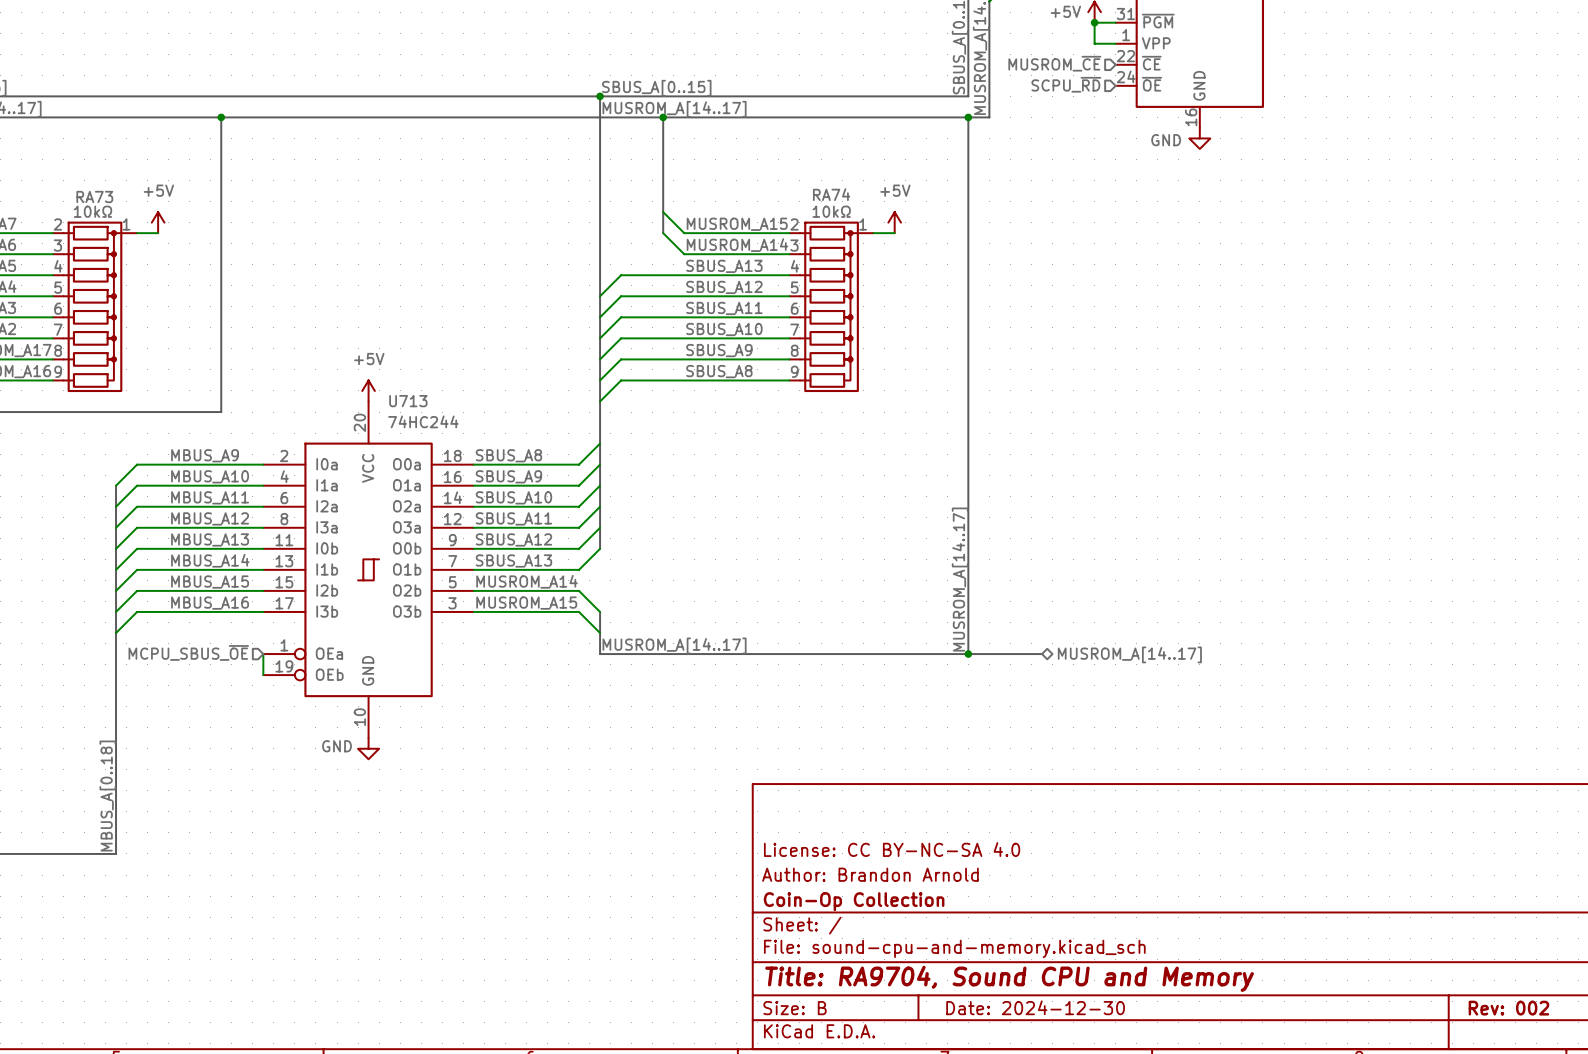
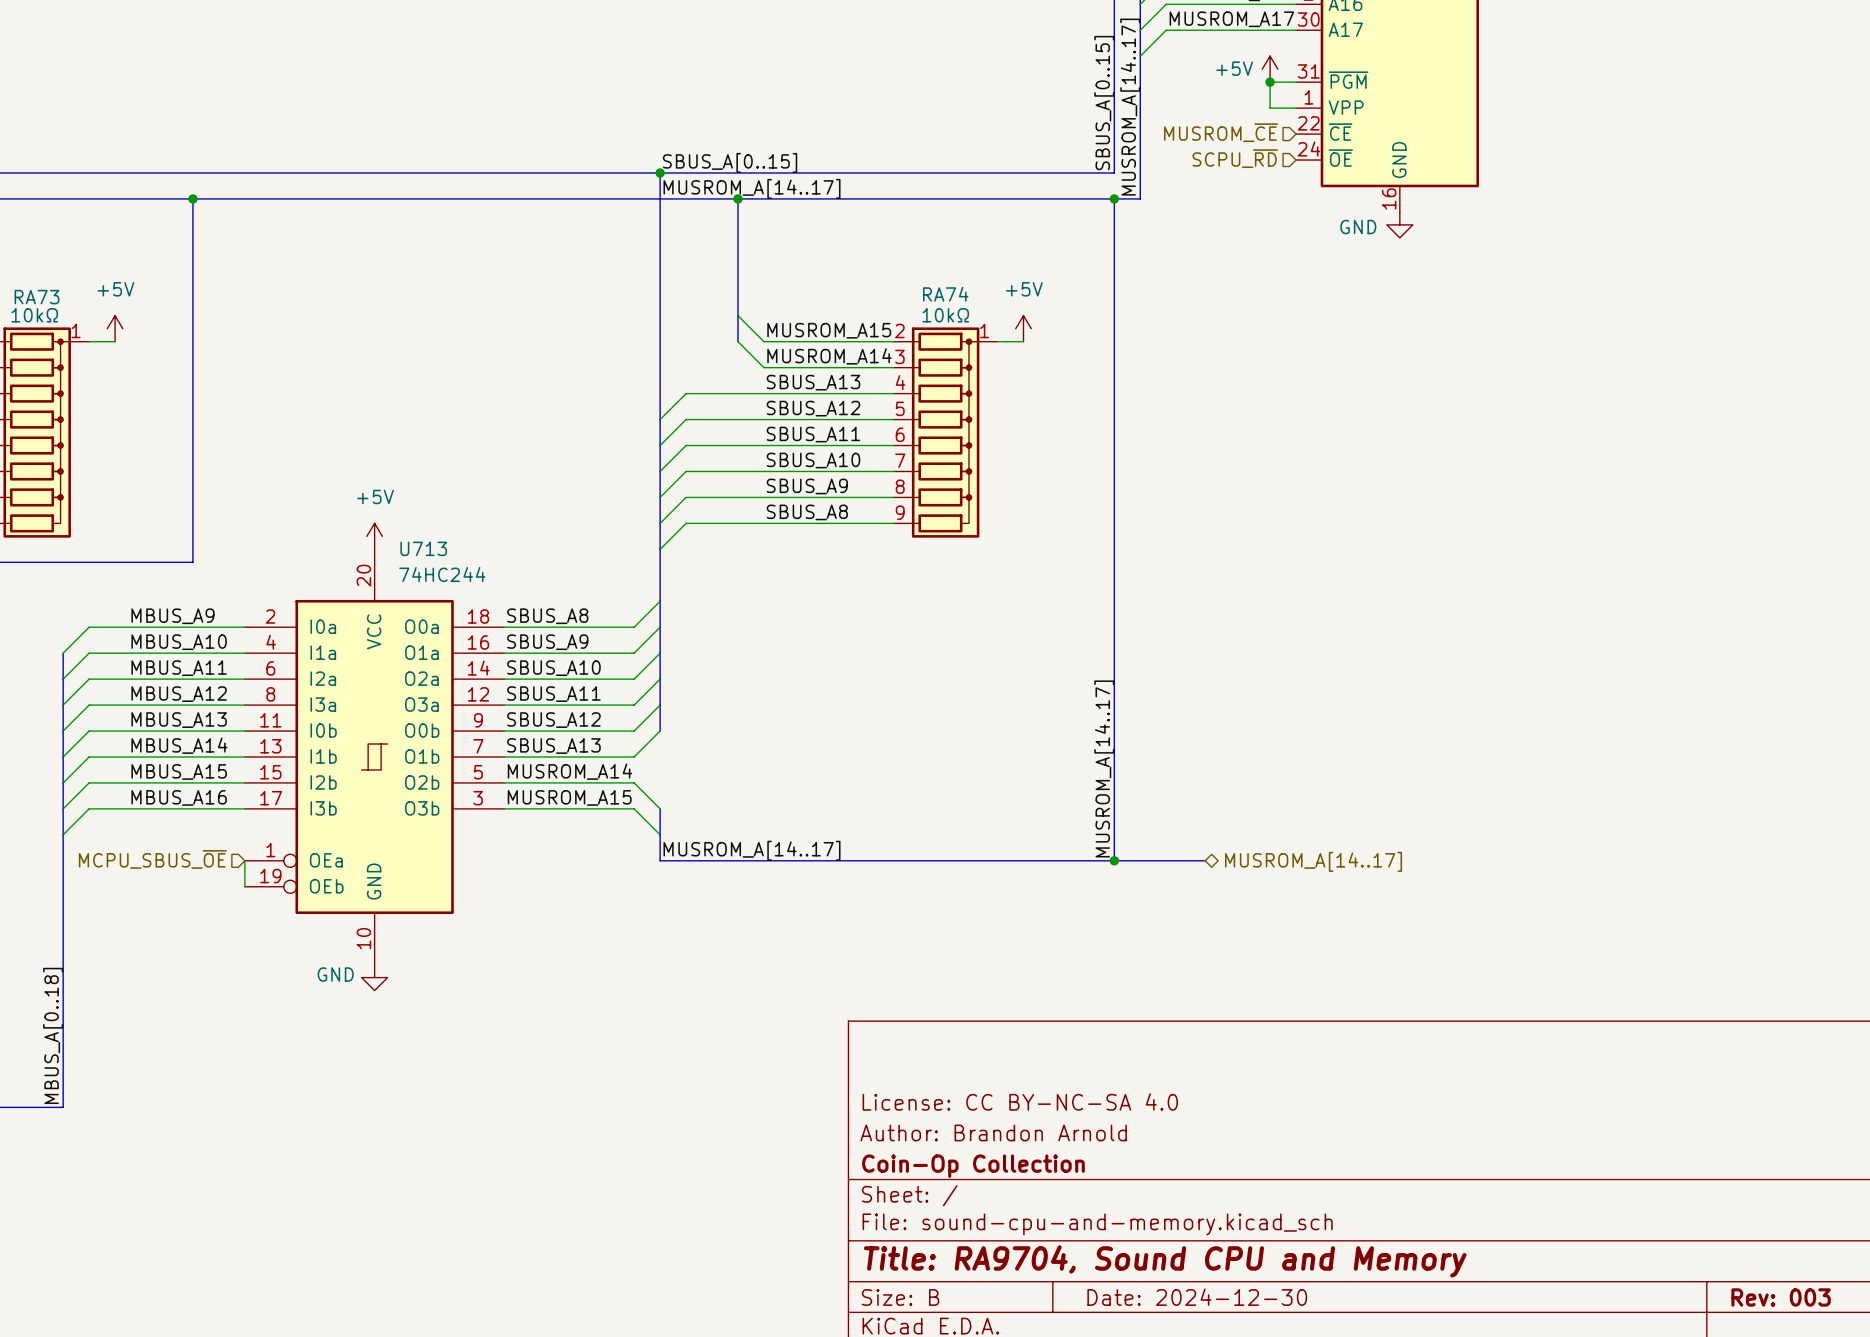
title block: Rev: 002 (1508, 1008) -> Rev: 003 (1781, 1297)

